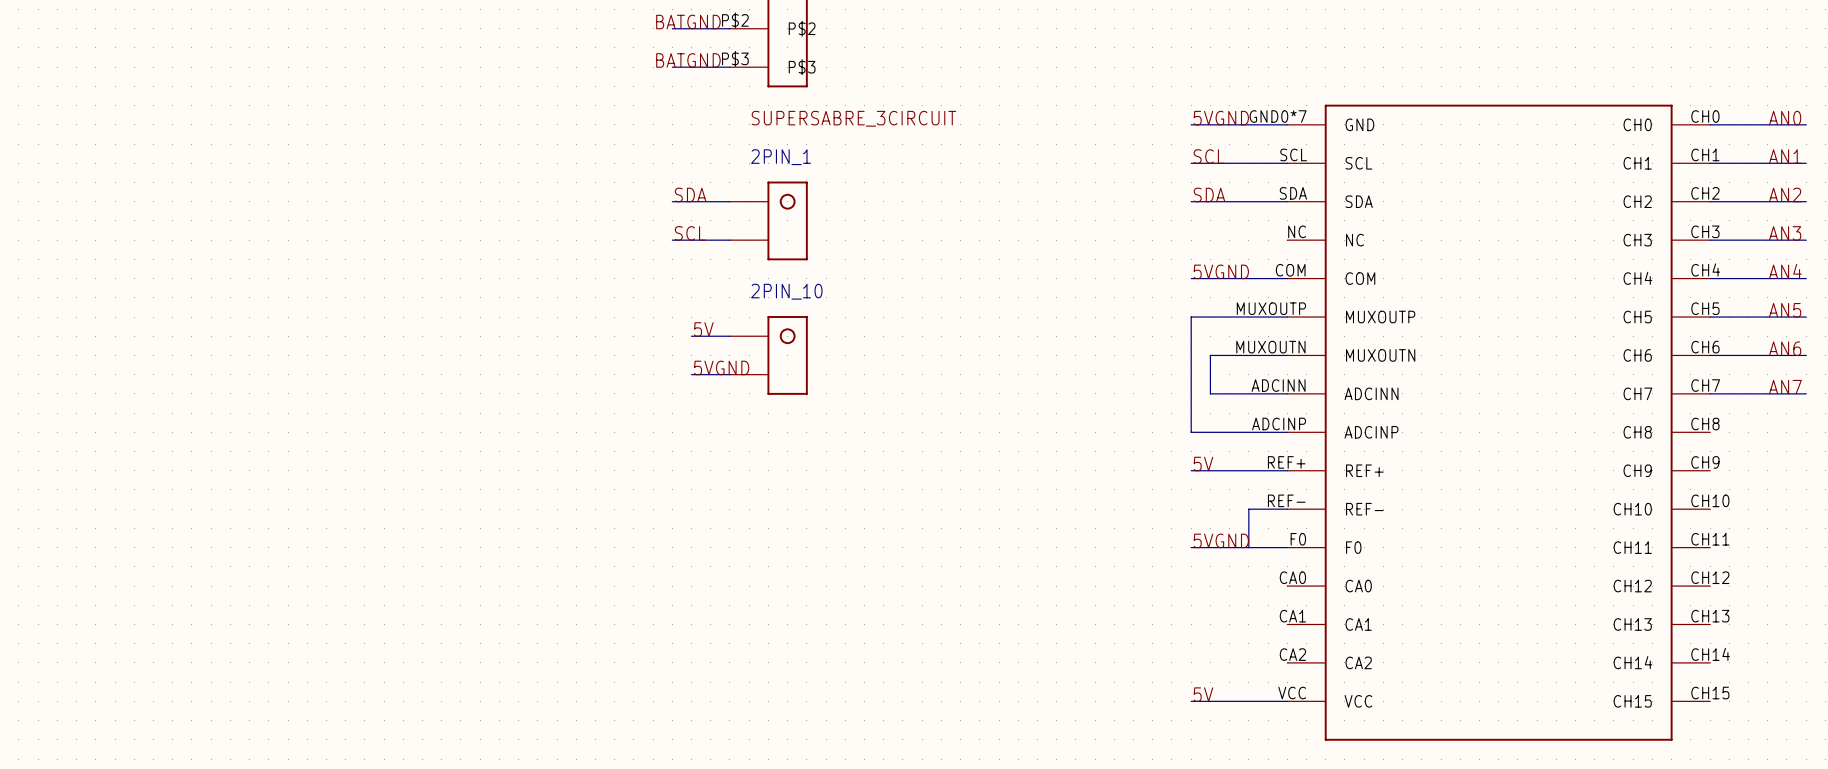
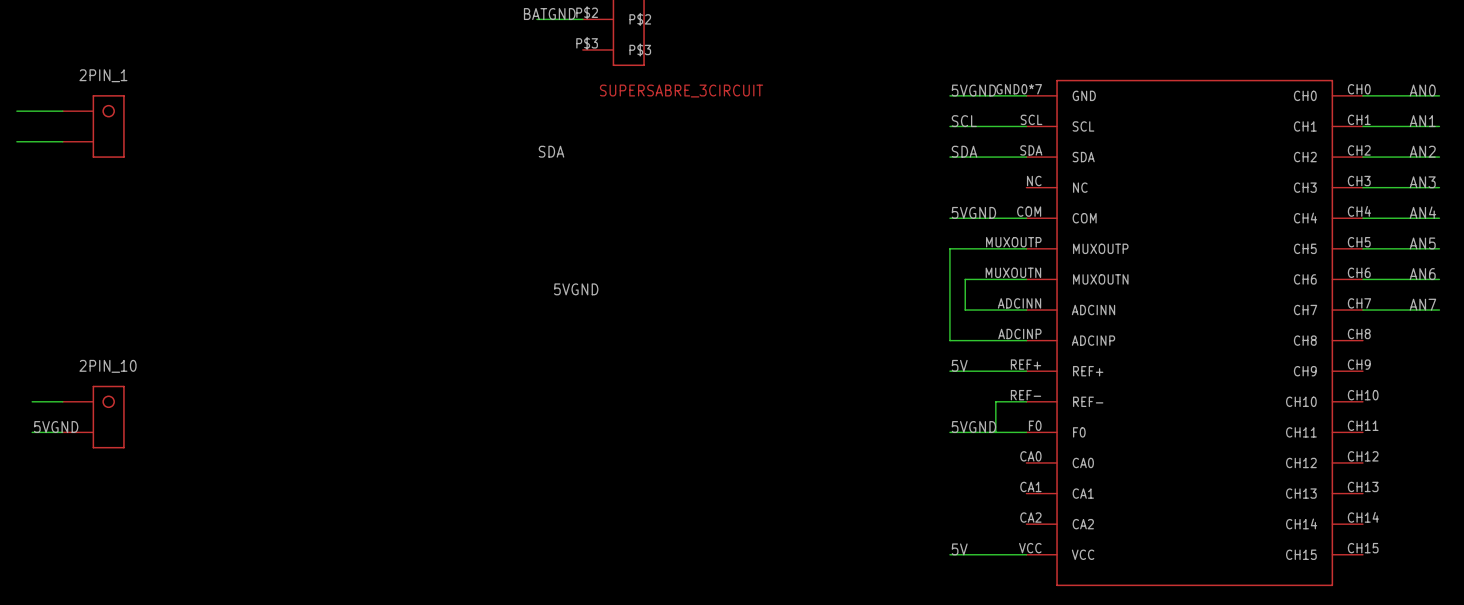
label: BATGND (688, 60) -> none
wire: (672, 67) (729, 67) -> none
wire: none -> (16, 111) (62, 111)
wire: none -> (16, 141) (62, 141)
wire: (672, 201) (729, 201) -> none
2PIN_1 position: (768, 220) -> (93, 126)
label: SCL (690, 233) -> none
wire: (672, 240) (729, 240) -> none
label: 5V (703, 329) -> none
wire: (691, 336) (729, 336) -> none
2PIN_10 position: (768, 355) -> (93, 417)
wire: (691, 374) (729, 374) -> none
wire: none -> (32, 401) (62, 401)
label: none -> 5VGND (56, 427)
wire: none -> (32, 432) (62, 432)

